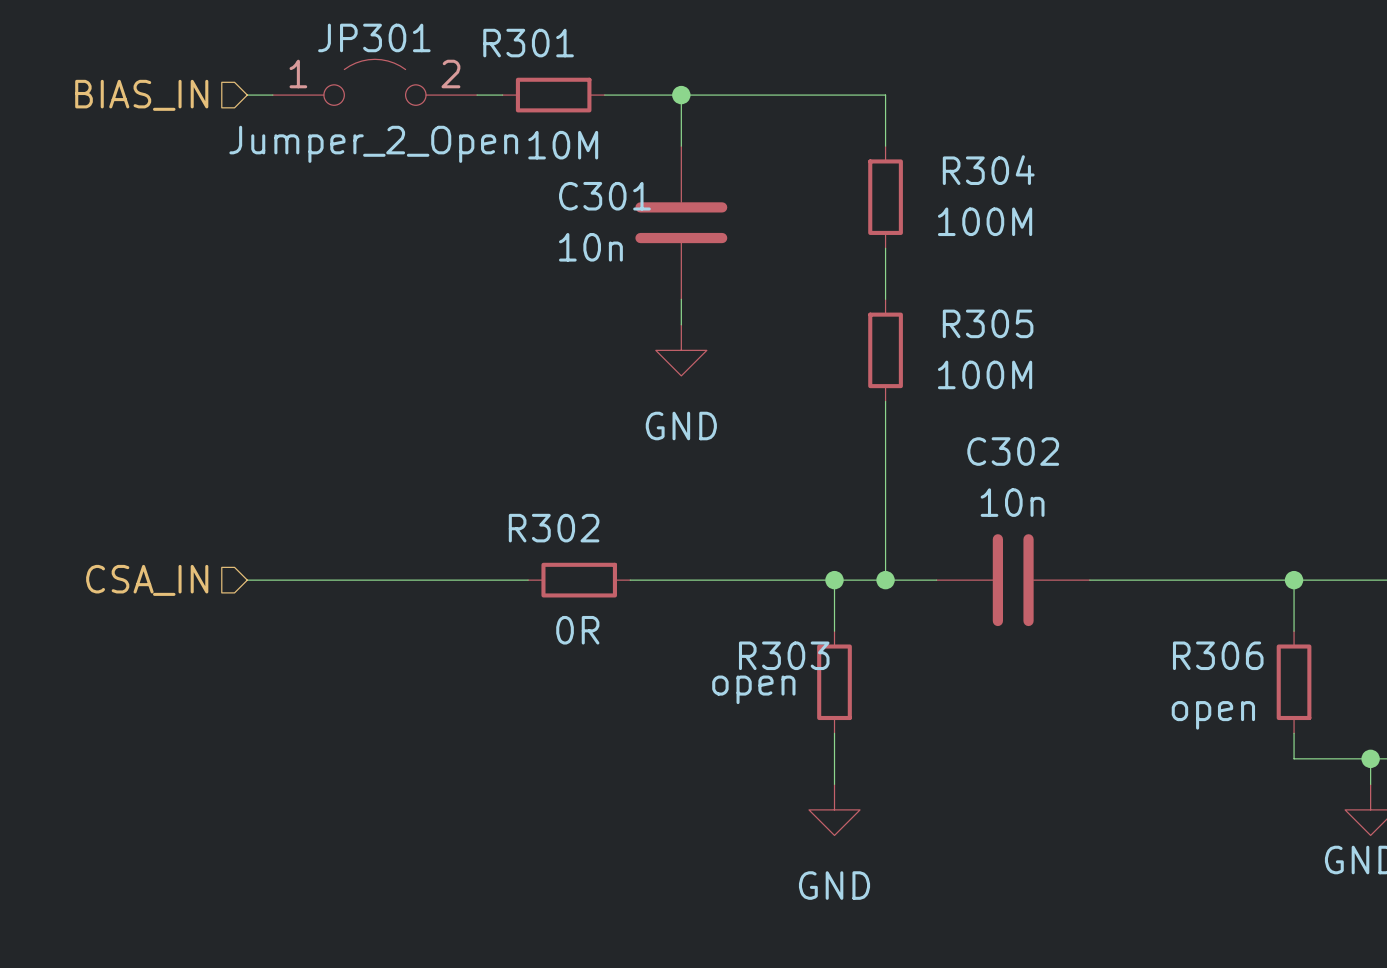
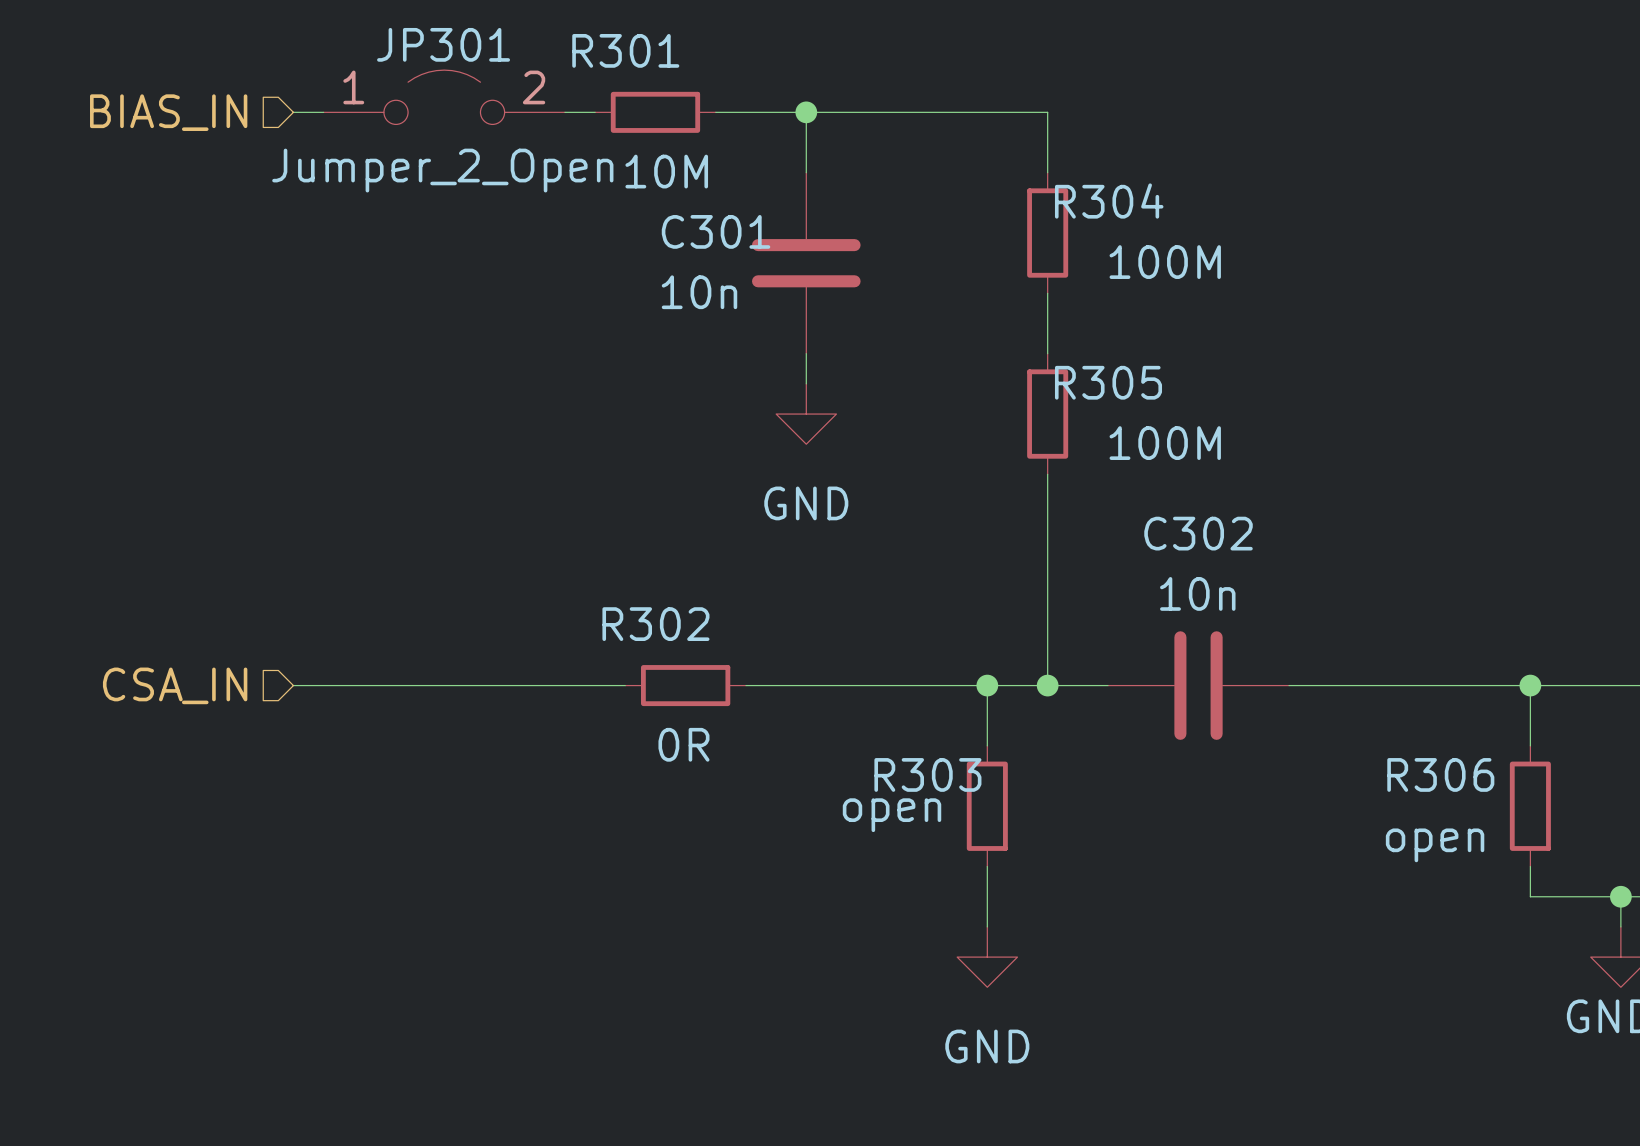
R304 name position: R304 (988, 170) -> R304 (1109, 201)
R305 name position: R305 (988, 323) -> R305 (1108, 382)

